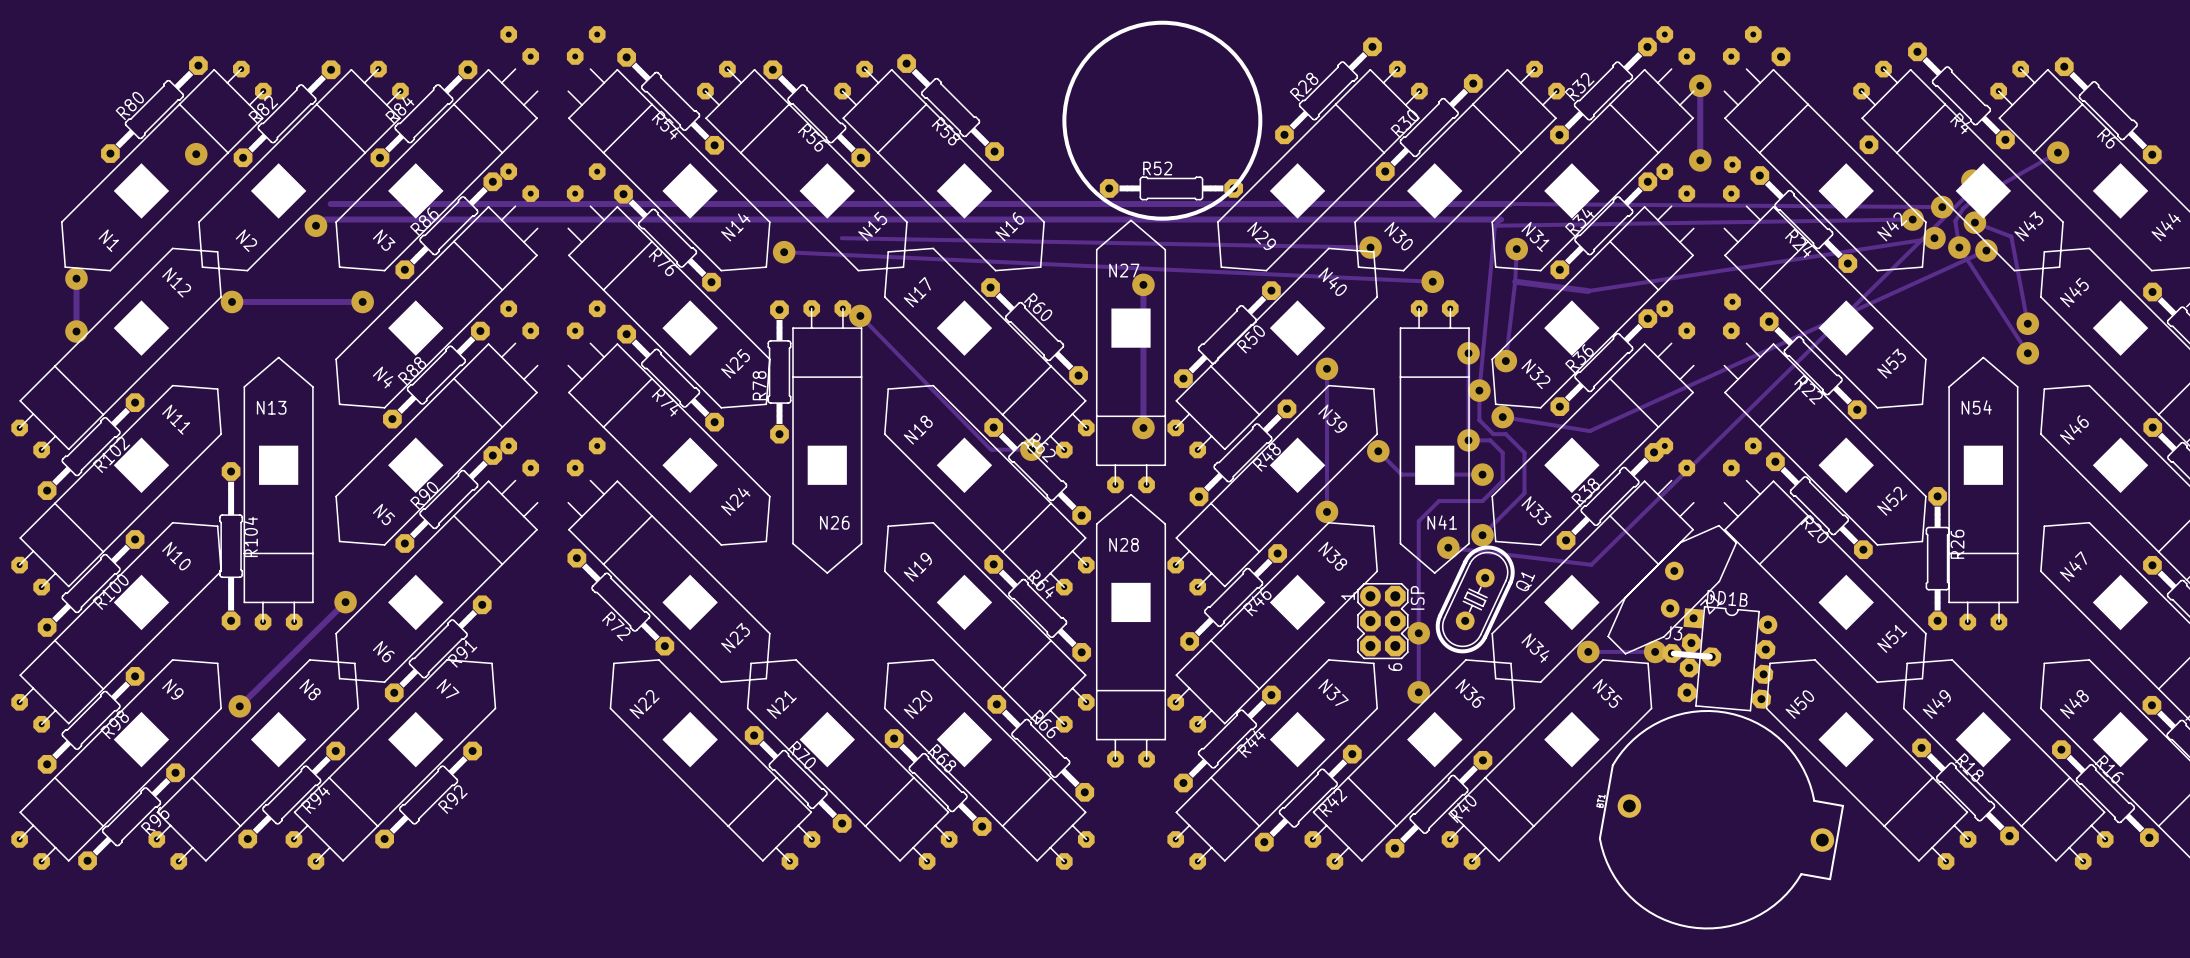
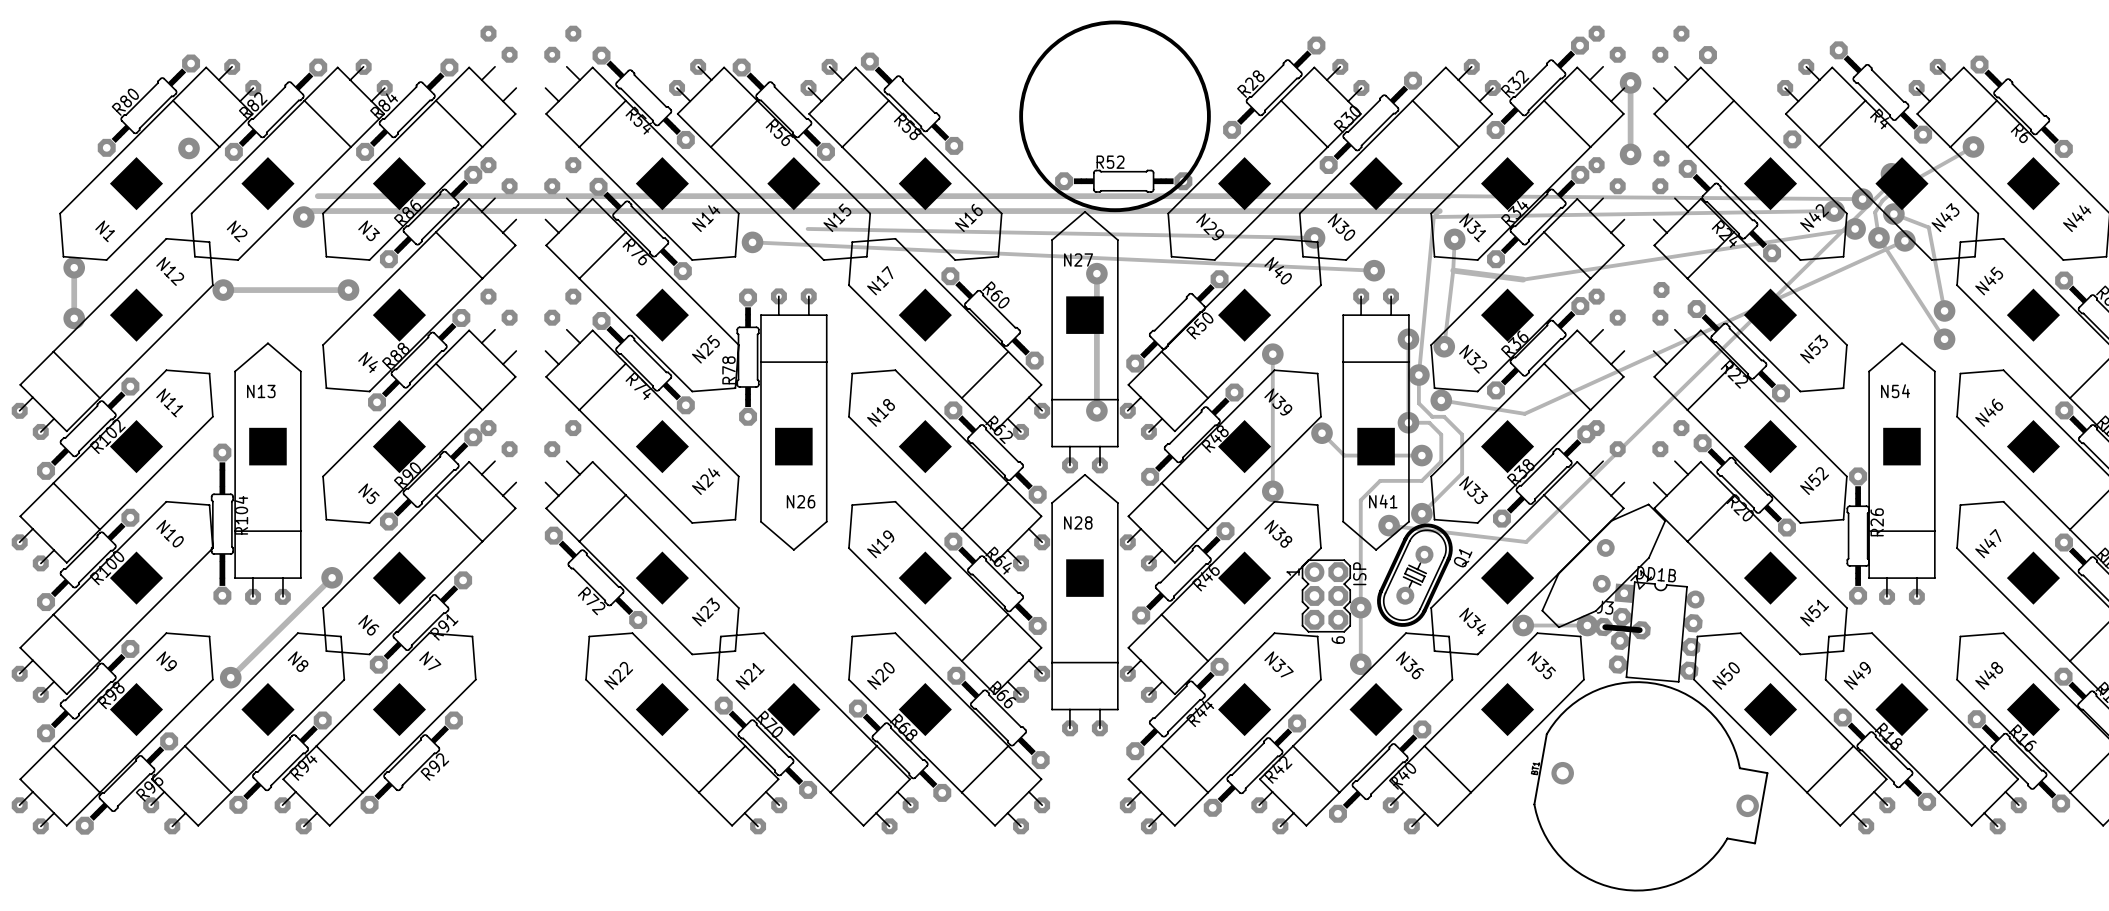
track: (860, 315) (990, 449) (1031, 449) -> none
via: (860, 315) -> none
via: (1031, 449) -> none

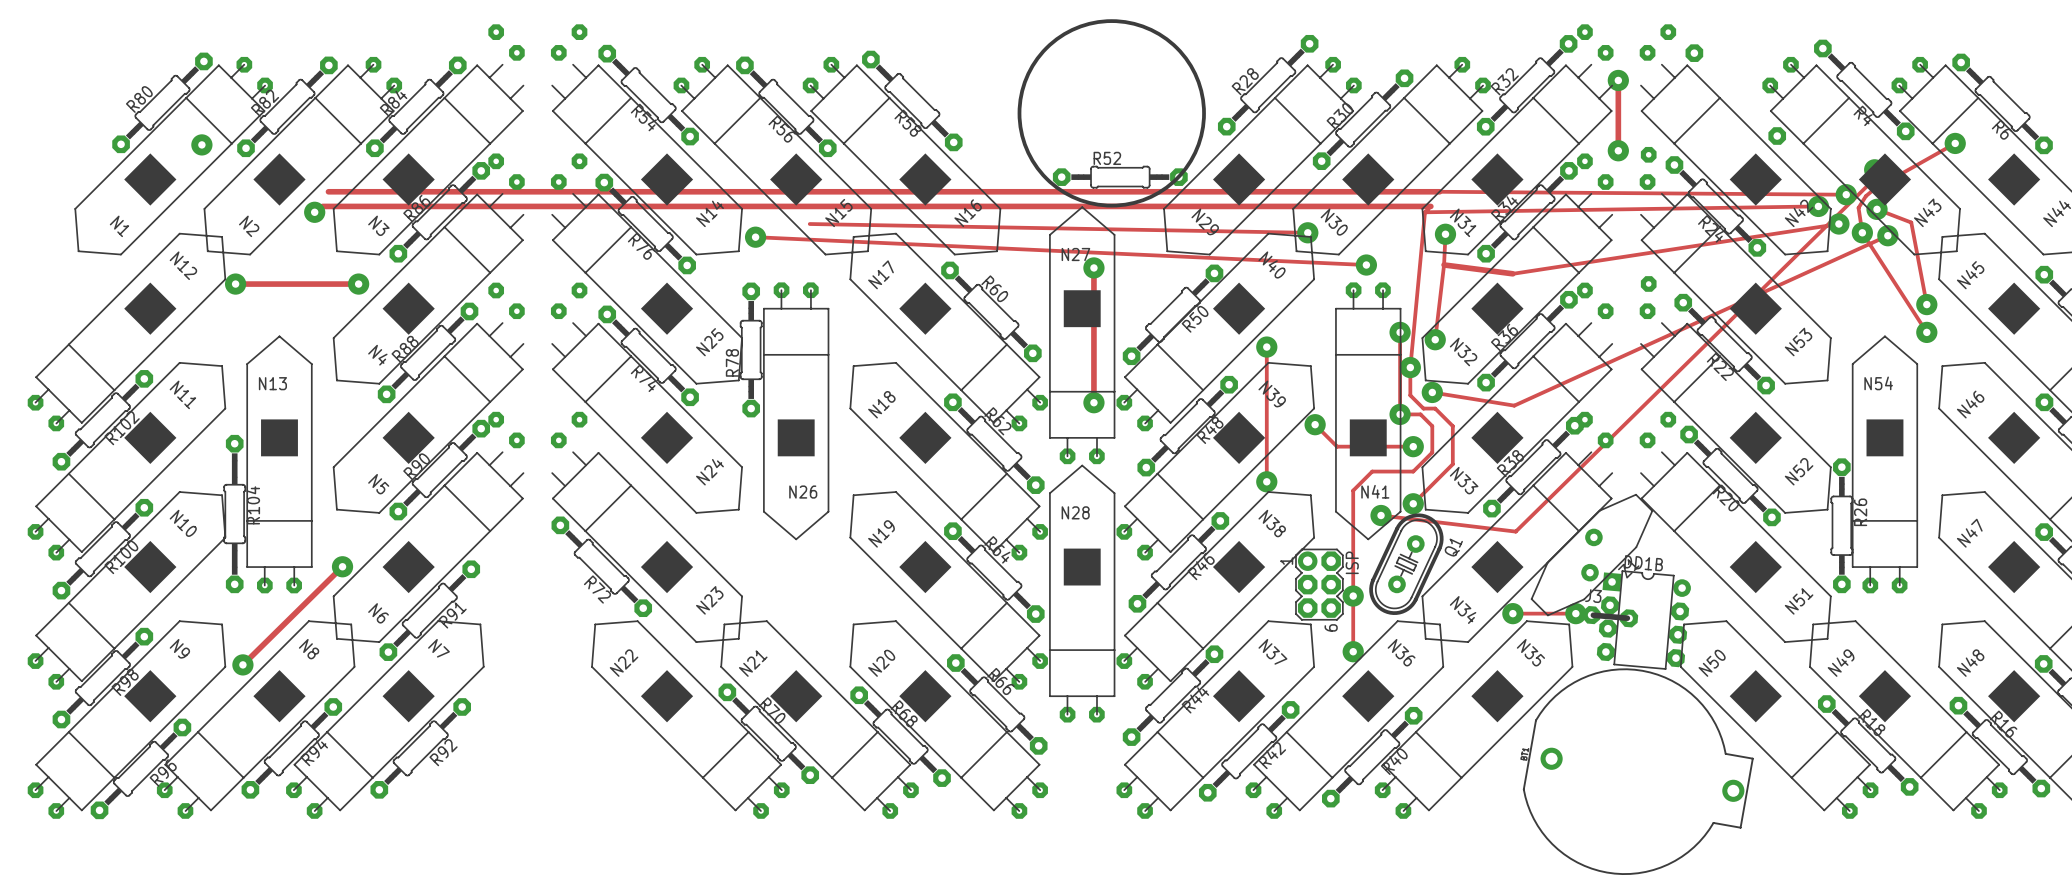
track: (74, 267) (74, 318) -> none
via: (74, 267) -> none
via: (74, 318) -> none

